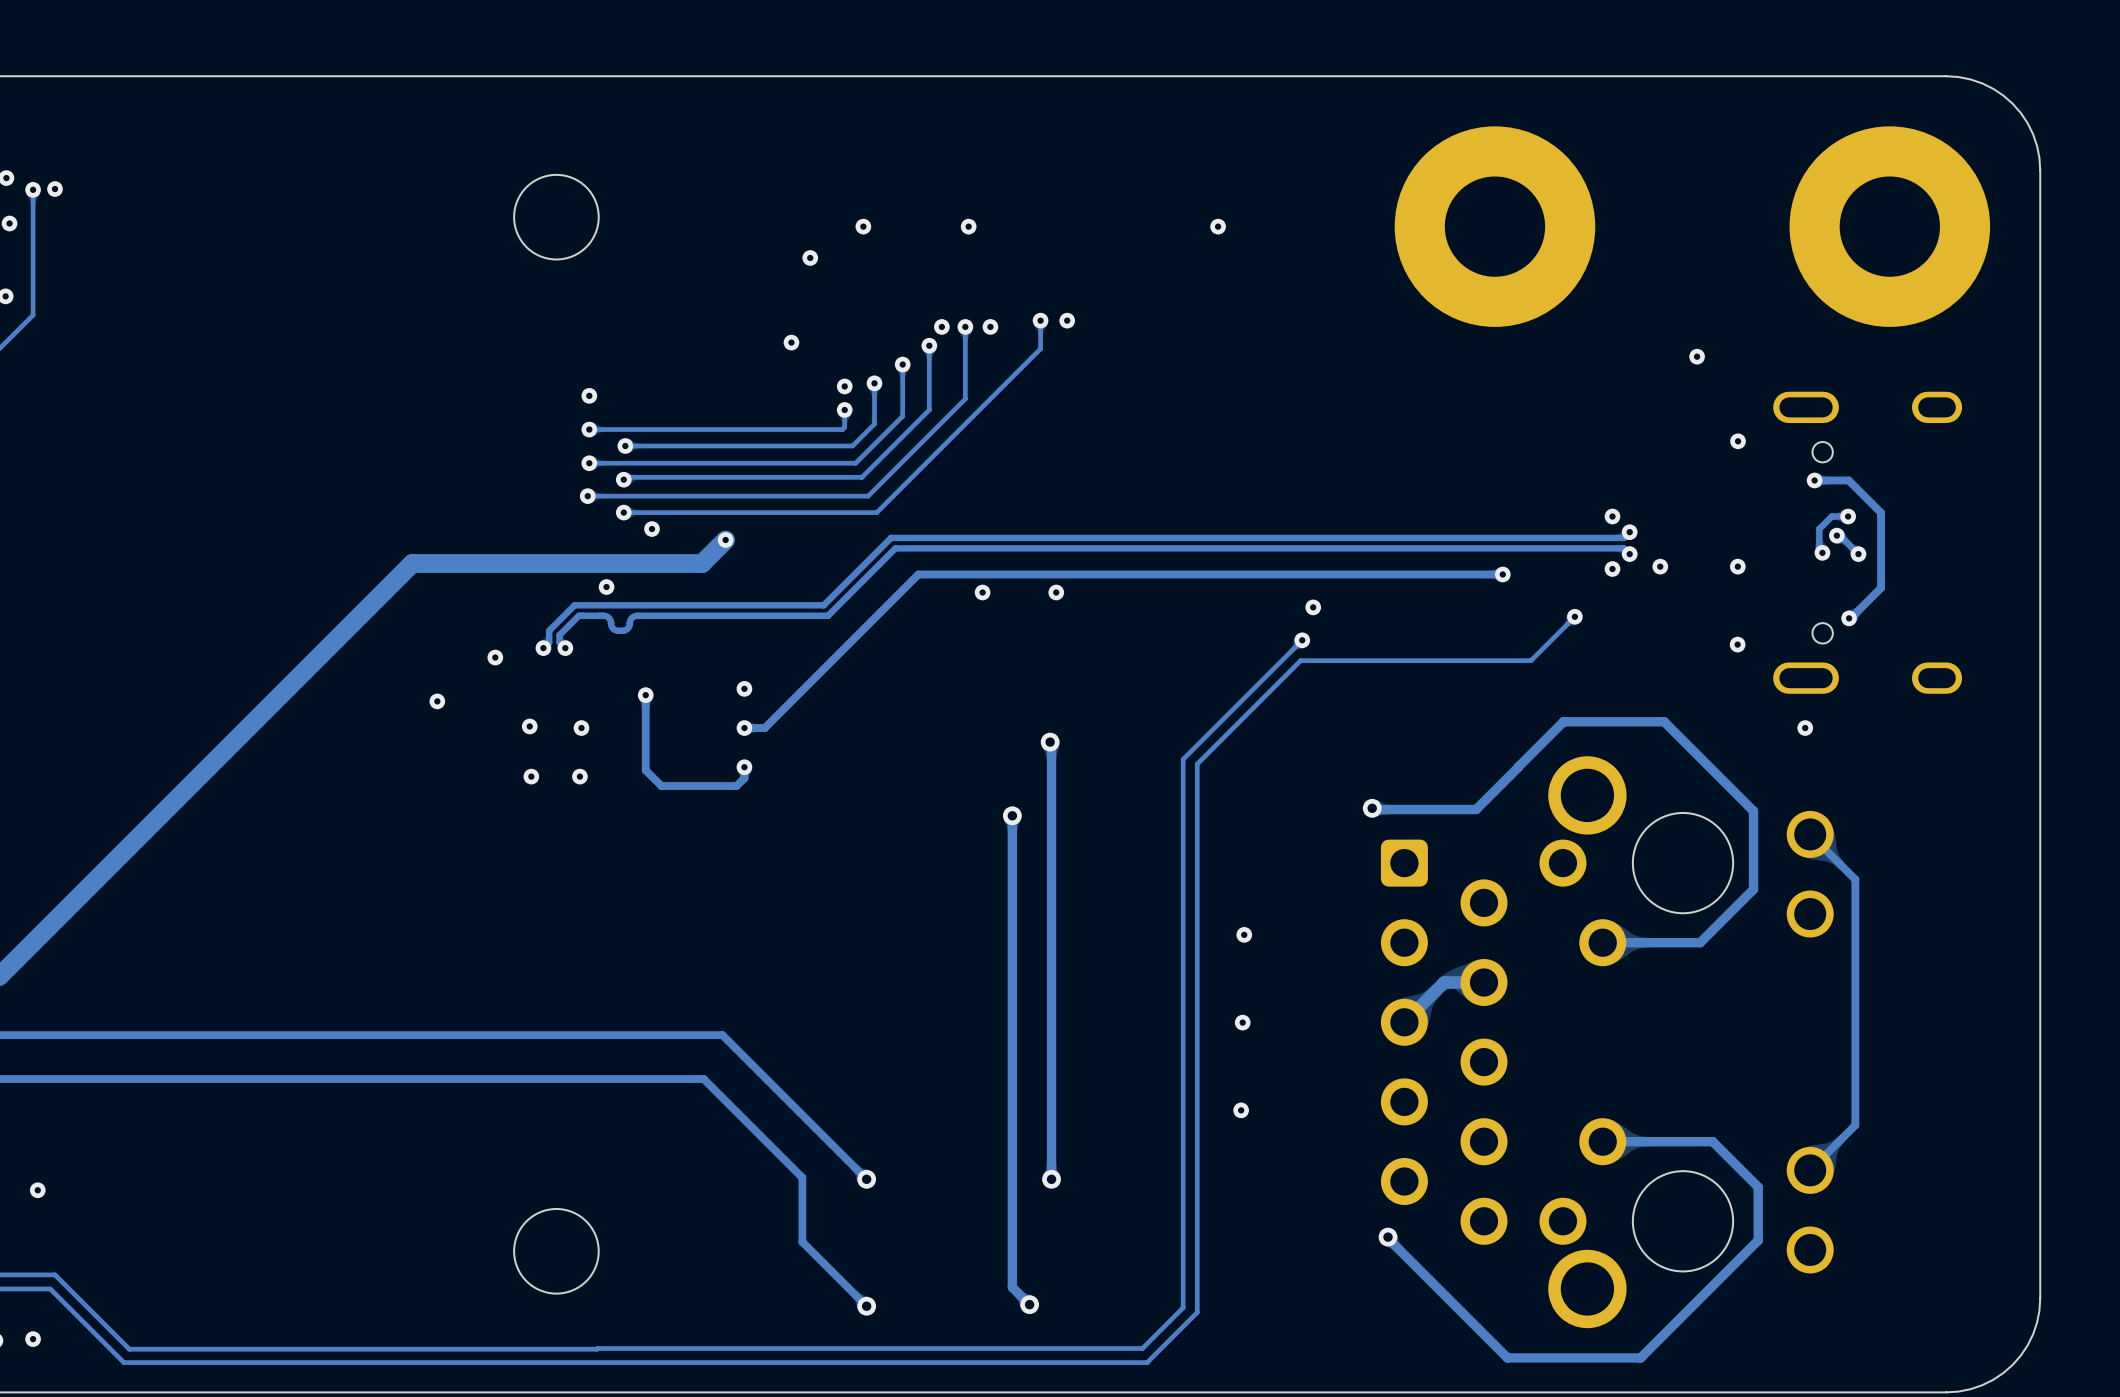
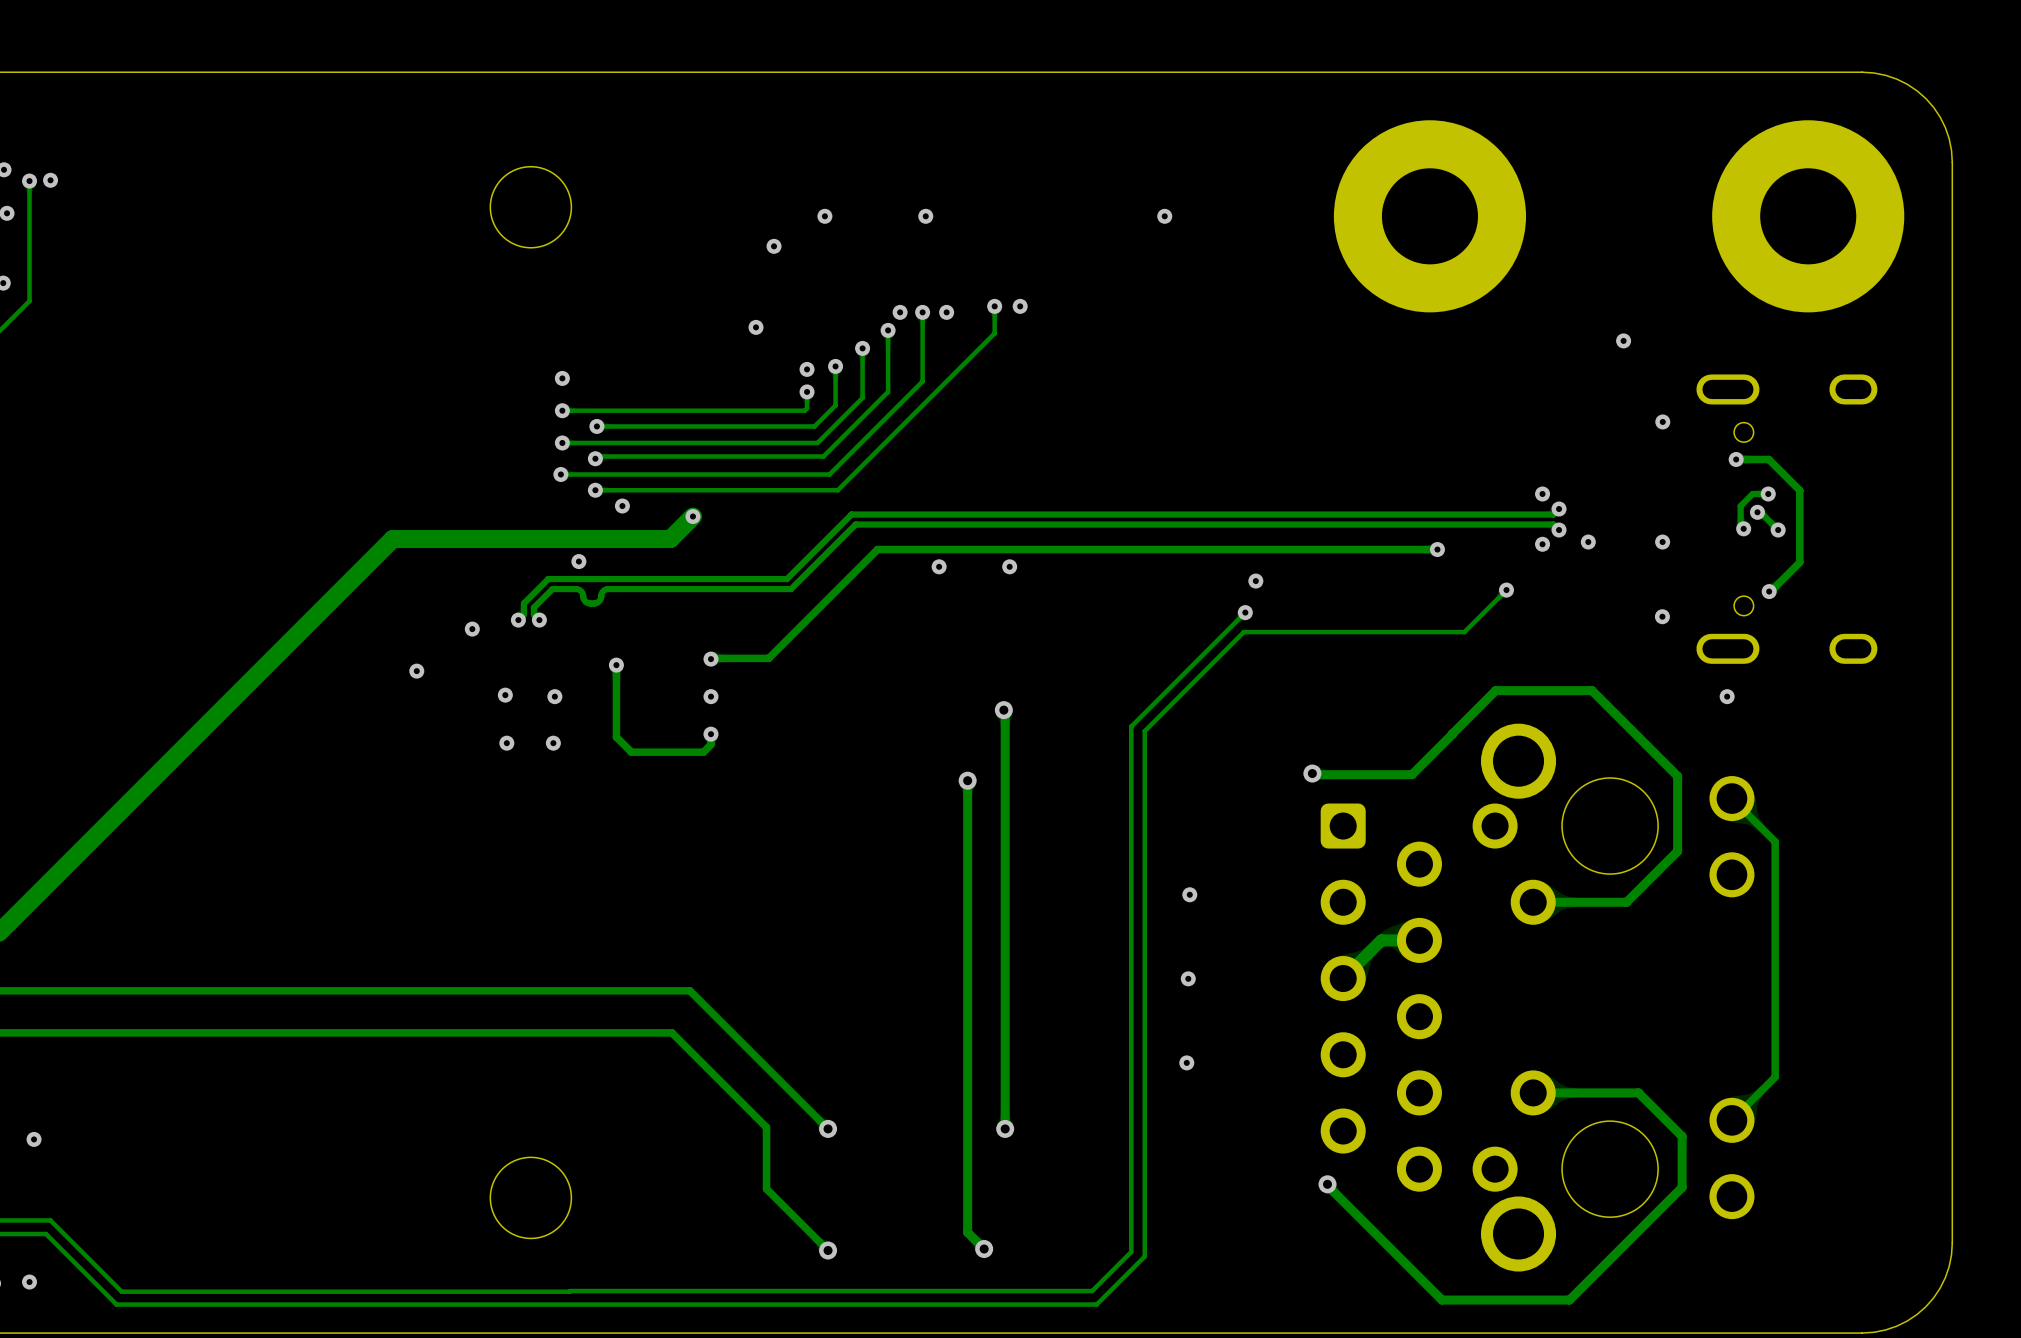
track: (804, 688) (764, 728) (744, 728) -> (768, 658) (711, 658)

